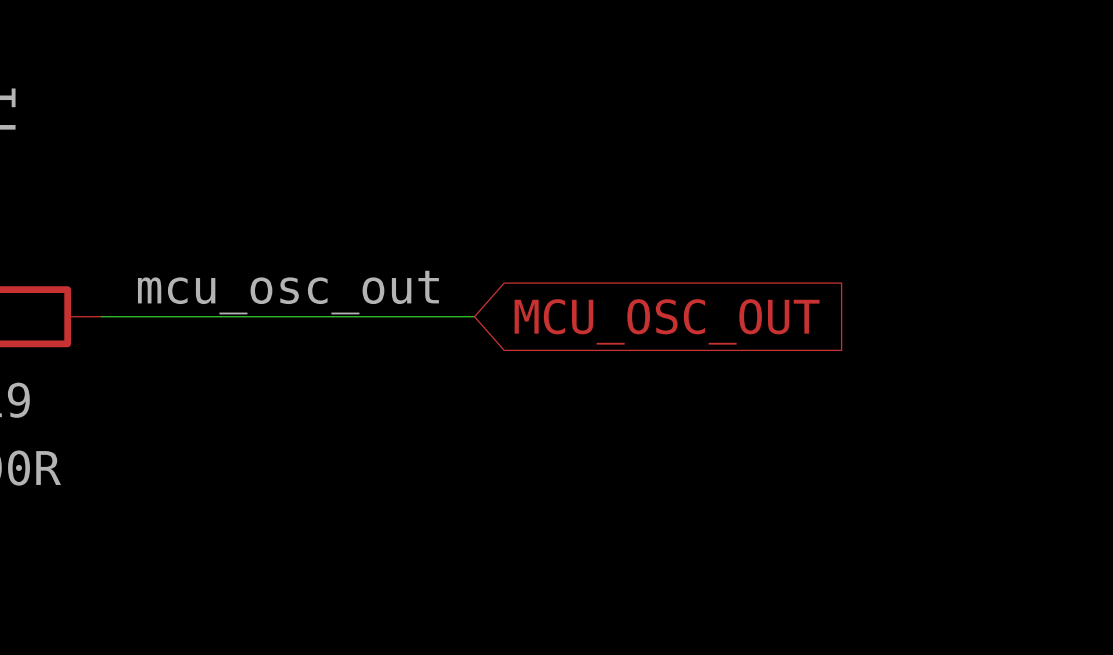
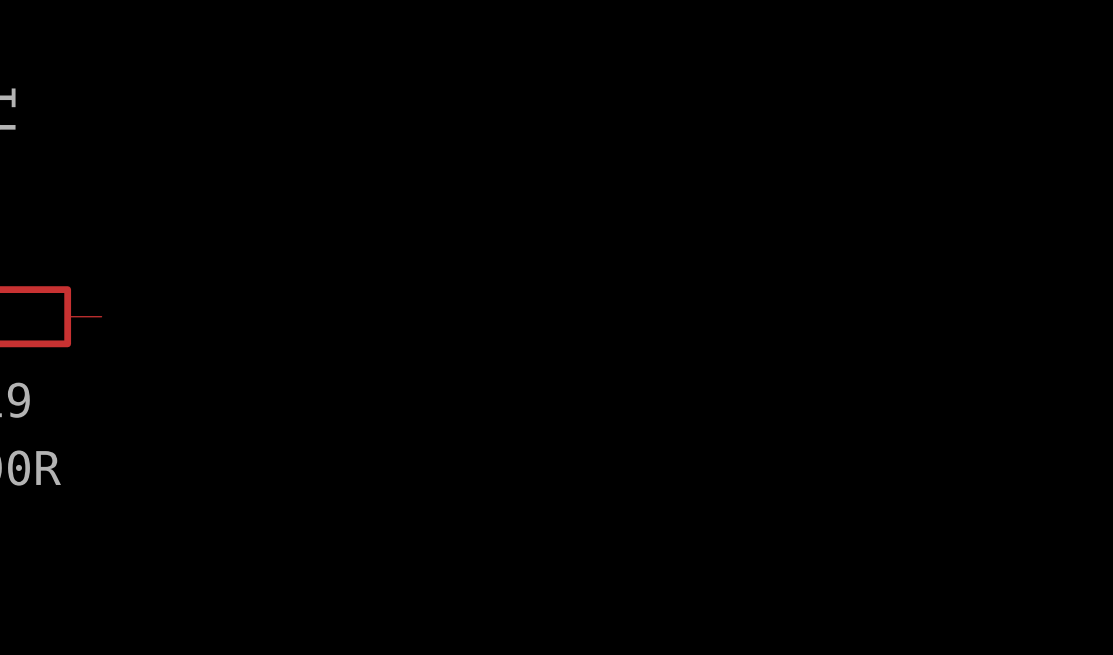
label: mcu_osc_out (288, 292) -> none
wire: (101, 316) (474, 316) -> none
global label: MCU_OSC_OUT (667, 321) -> none

